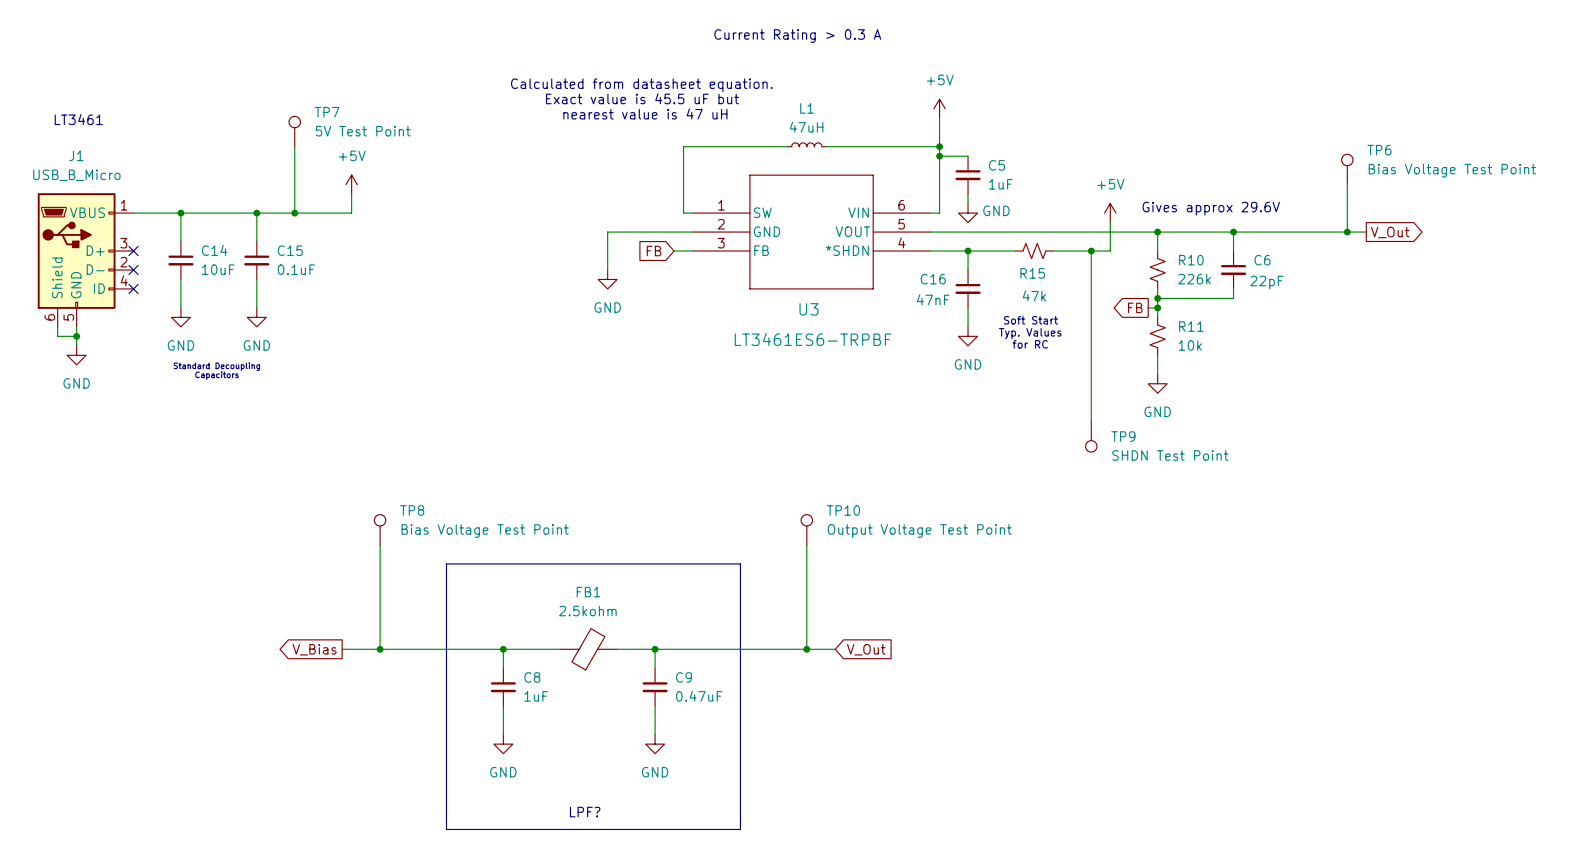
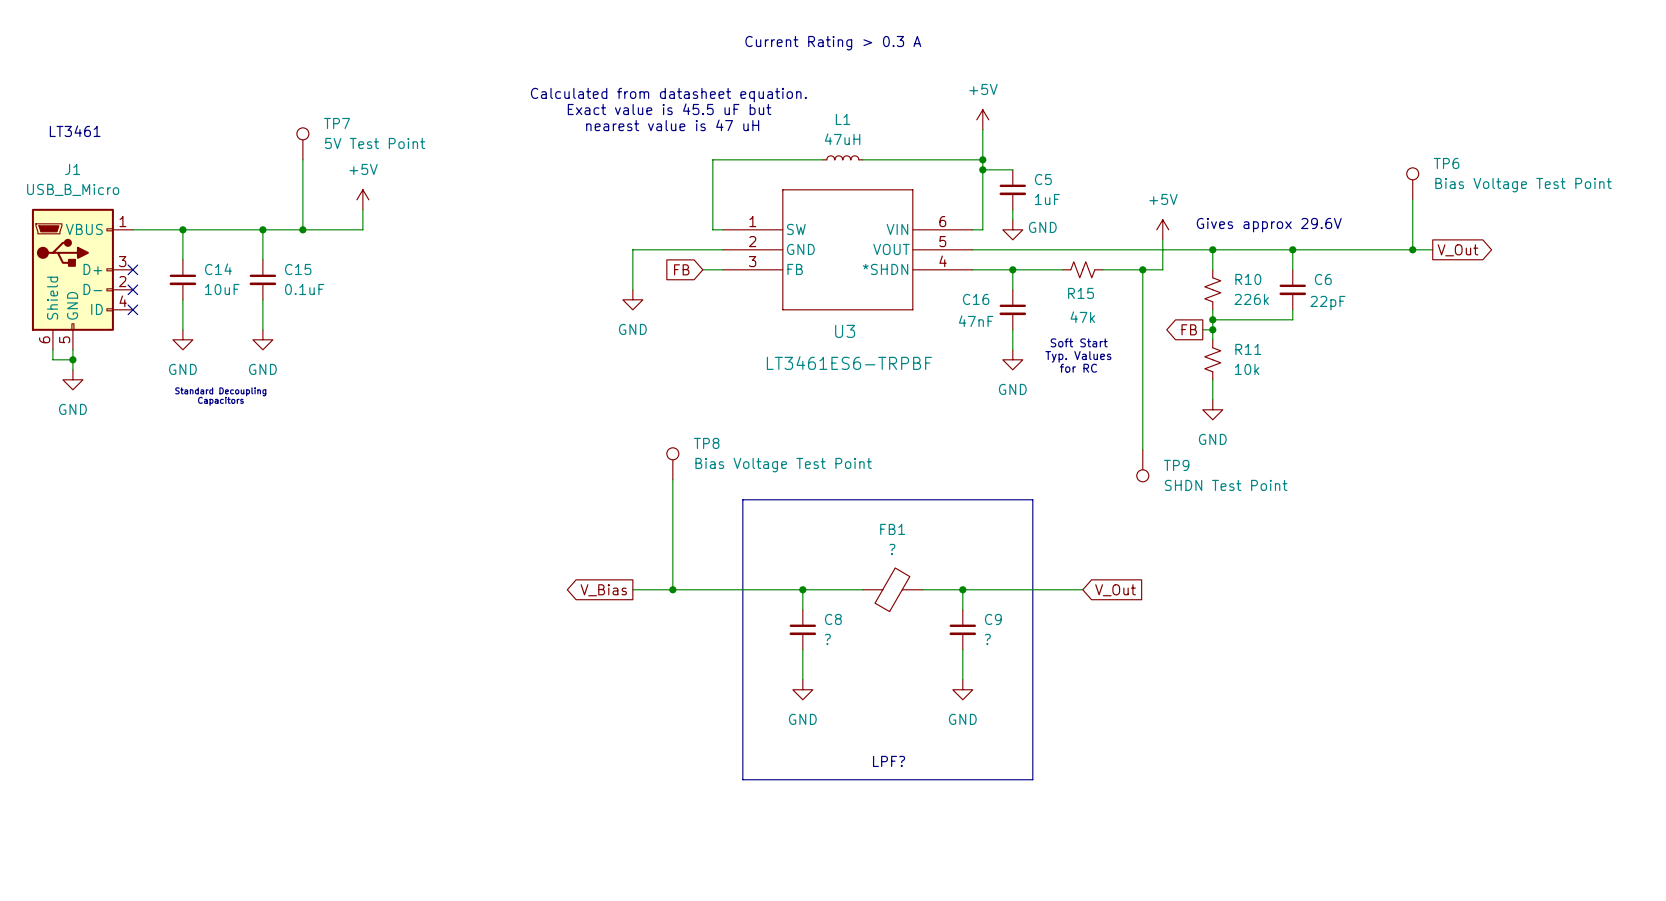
wire: none -> (672, 479) (672, 589)
line: none -> (742, 499) (1032, 499) (1032, 779) (742, 779) (742, 499)
TP8 position: (380, 529) -> (672, 463)
TP10: Output Voltage Test Point (806, 529) -> none
wire: (380, 544) (380, 649) -> none
wire: (806, 544) (806, 649) -> none
global label: none -> V_Bias (603, 590)
junction: none -> (672, 589)
junction: none -> (802, 589)
wire: none -> (922, 589) (1082, 589)
wire: none -> (962, 589) (962, 609)
junction: none -> (962, 589)
global label: none -> V_Out (1115, 590)
line: (446, 563) (740, 563) (740, 829) (446, 829) (446, 563) -> none
FB1 value: 2.5kohm (587, 611) -> ? (892, 549)
wire: none -> (962, 649) (962, 679)
global label: V_Bias (314, 649) -> none
wire: (342, 649) (560, 649) -> none
junction: (380, 649) -> none
wire: (503, 649) (503, 668) -> none
junction: (503, 649) -> none
FB1 position: (588, 649) -> (892, 589)
wire: (617, 649) (835, 649) -> (632, 589) (862, 589)
wire: (655, 649) (655, 668) -> (802, 589) (802, 609)
junction: (655, 649) -> none
power symbol: none -> GND (802, 689)
junction: (806, 649) -> none
global label: V_Out (866, 649) -> none
power symbol: none -> GND (962, 689)
C8 position: (503, 687) -> (802, 629)
C9 position: (655, 687) -> (962, 629)
C8 value: 1uF (536, 696) -> ? (827, 639)
C9 value: 0.47uF (699, 696) -> ? (987, 639)
wire: (503, 706) (503, 734) -> none
wire: (655, 706) (655, 734) -> (802, 649) (802, 679)
text: none -> LPF? (889, 761)
power symbol: GND (503, 744) -> none
power symbol: GND (655, 744) -> none
text: LPF? (585, 812) -> none

